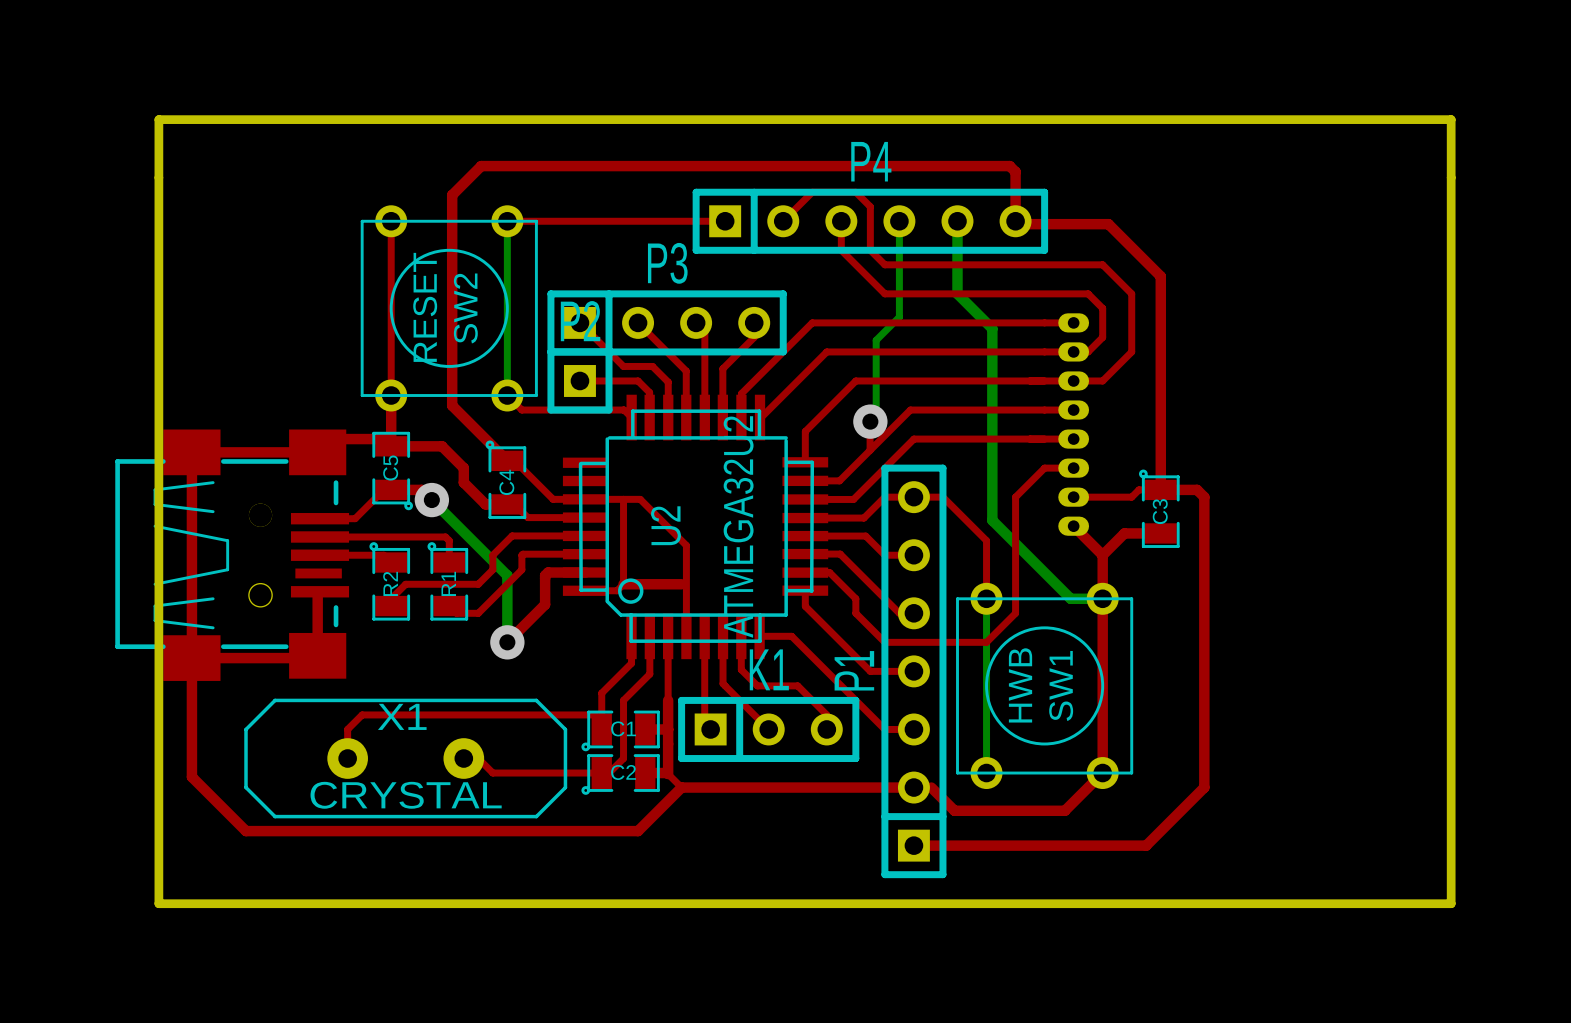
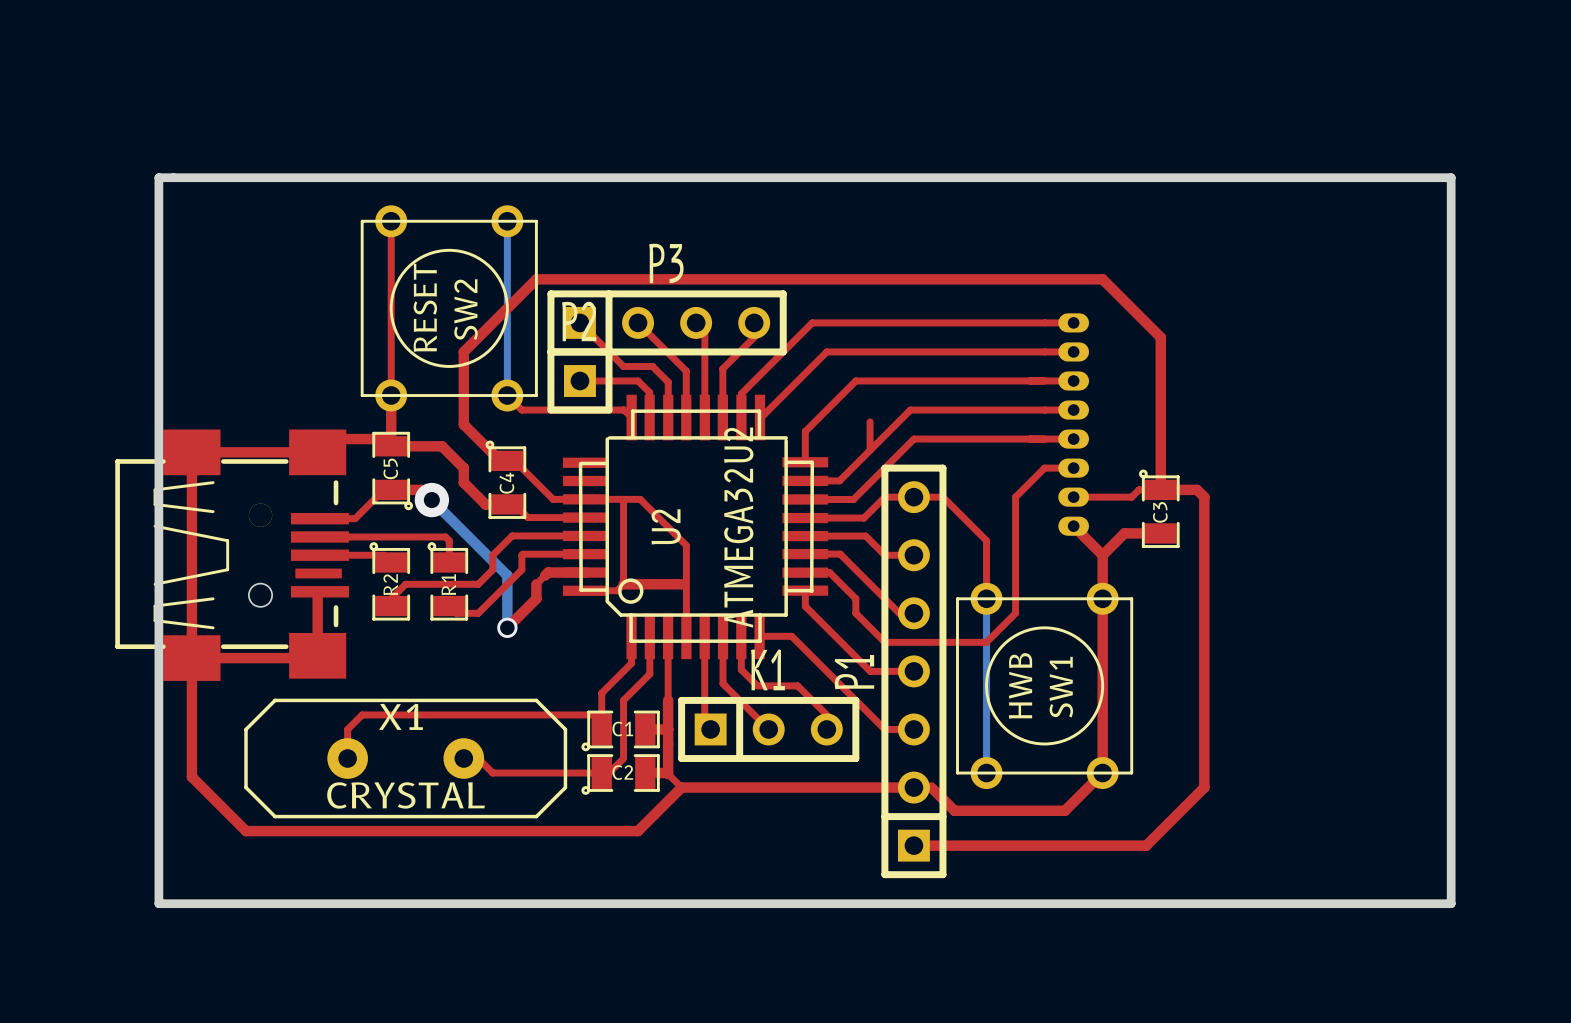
board edge: (158, 177) (158, 119) (1451, 119) (1451, 177) -> (158, 177) (1451, 177)
top track: (507, 221) (725, 221) -> none
top track: (783, 221) (812, 192) (855, 192) (870, 206) (870, 250) (884, 264) (1102, 264) (1131, 293) (1131, 351) (1102, 380) (1073, 380) -> none
top track: (841, 221) (841, 250) (884, 293) (1088, 293) (1102, 308) (1102, 337) (1088, 351) (1073, 351) -> none
P4: (870, 221) -> none
bottom track: (899, 221) (899, 317) (876, 340) (876, 415) (870, 421) -> none
bottom track: (957, 221) (957, 293) (992, 328) (992, 520) (1070, 598) (1102, 598) -> none
top track: (1160, 337) (1160, 276) (1108, 224) (1018, 224) (1015, 221) (1015, 171) (1009, 166) (481, 166) (452, 195) (452, 405) (507, 460) -> (1160, 337) (1102, 279) (536, 279) (463, 351) (463, 424) (500, 460) (507, 460)
via: (870, 421) -> none
top track: (545, 575) (545, 604) (507, 642) -> (545, 575) (536, 584) (536, 598) (507, 627)
via size: [490, 625, 525, 660] -> [497, 617, 518, 638]

